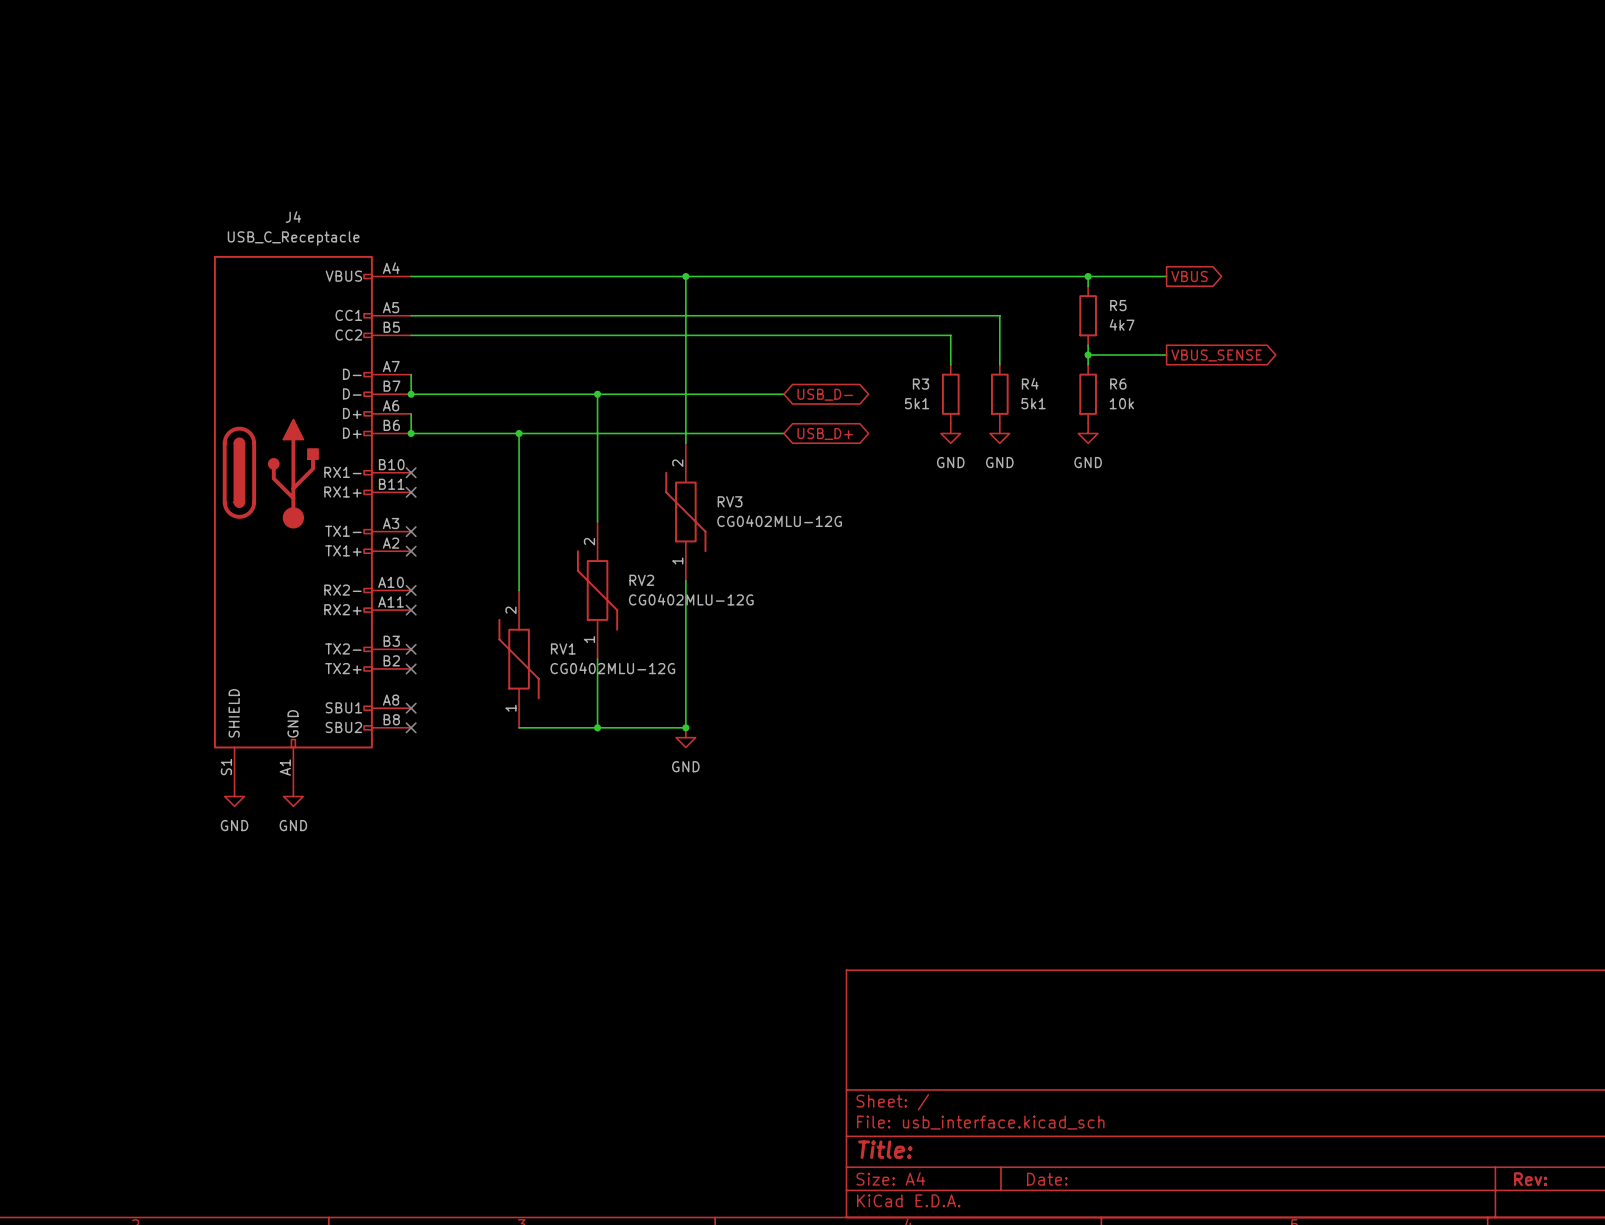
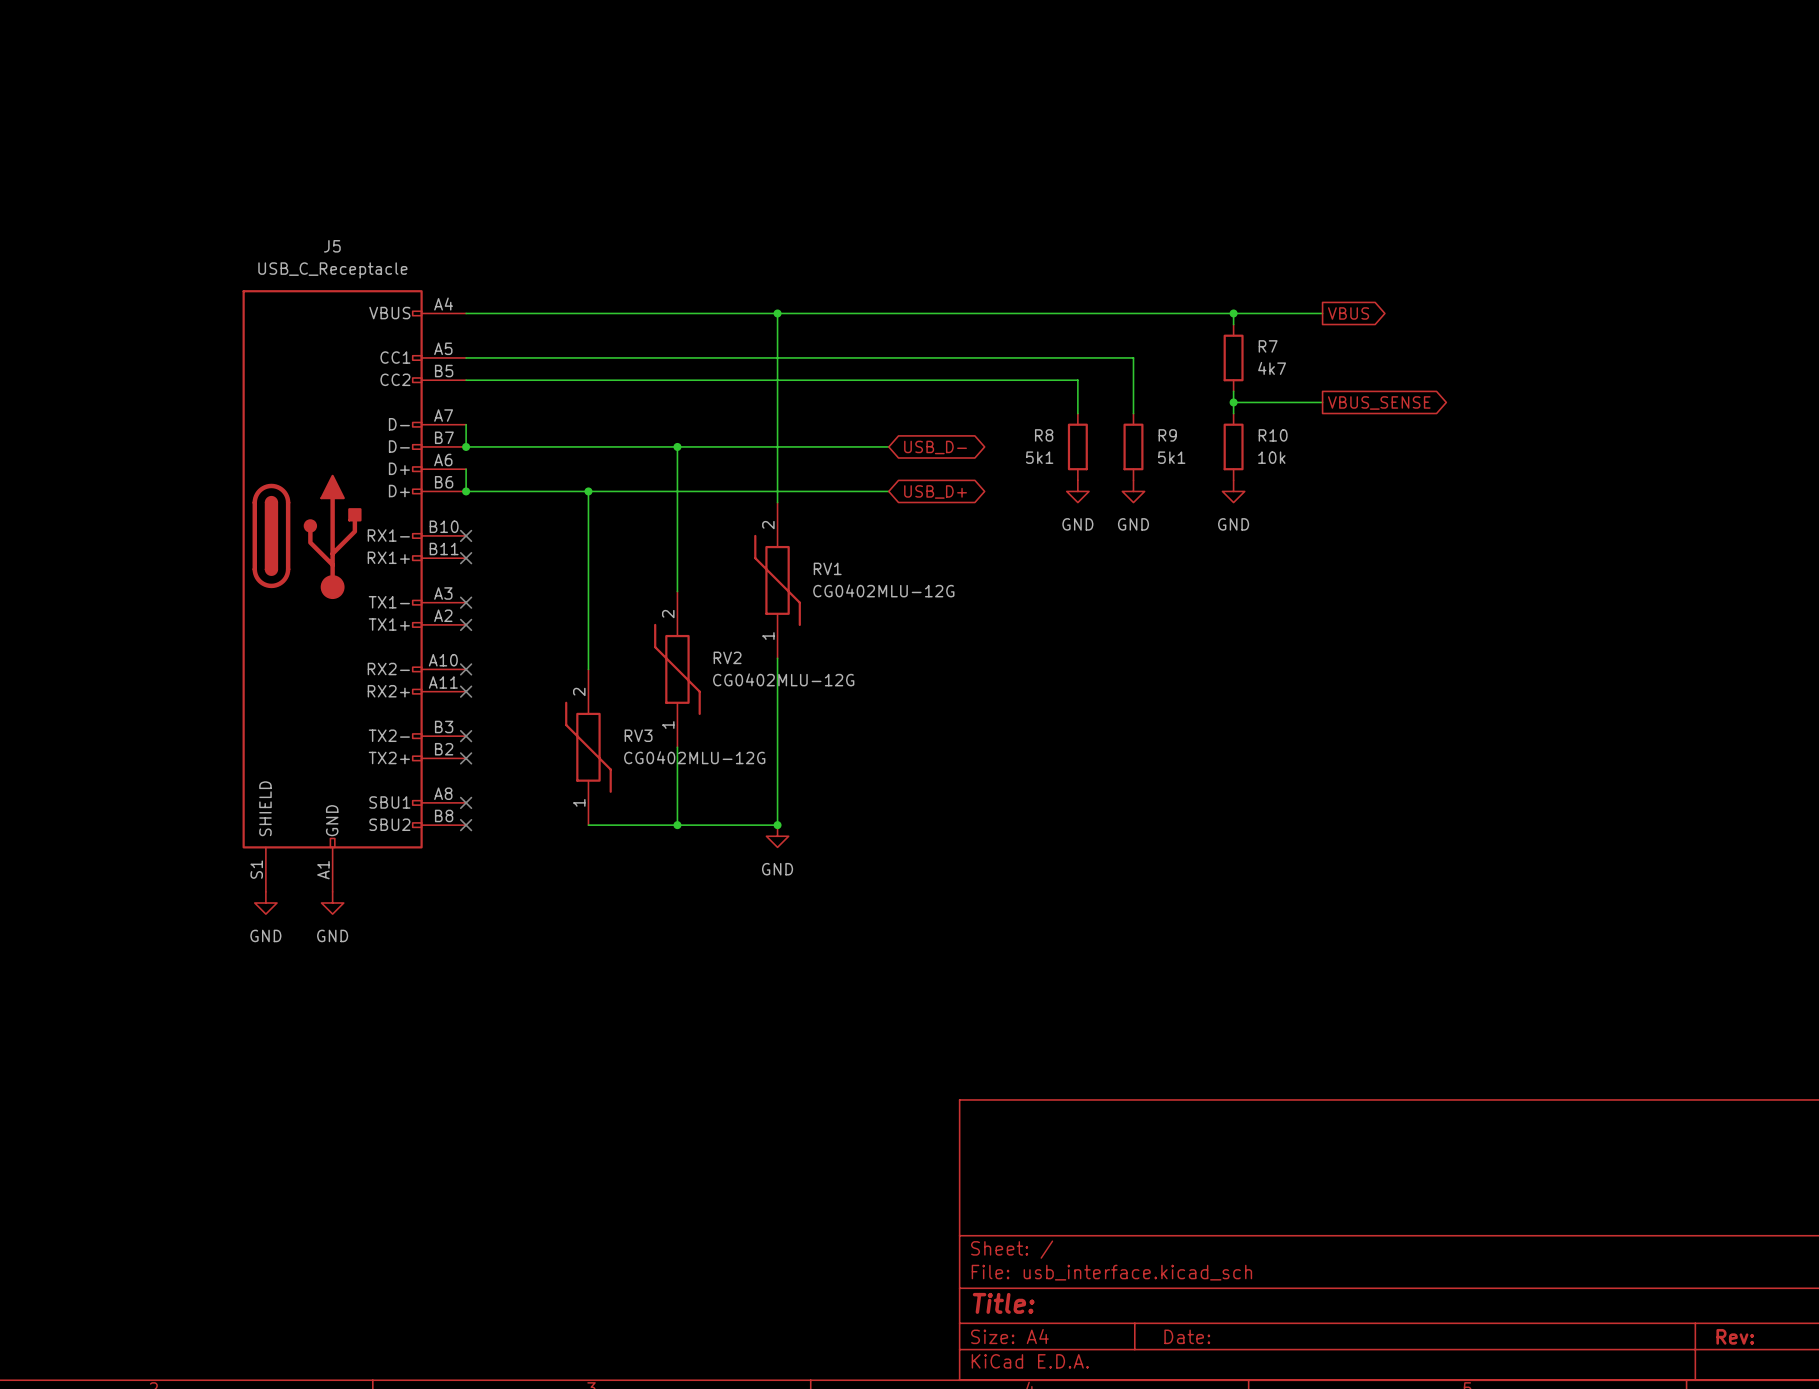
J4 name: J4 (293, 217) -> J5 (332, 246)
R5 name: R5 (1118, 305) -> R7 (1268, 346)
R4 name: R4 (1030, 383) -> R9 (1167, 435)
R3 name: R3 (921, 384) -> R8 (1044, 435)
R6 name: R6 (1118, 384) -> R10 (1273, 435)
RV3 name: RV3 (730, 501) -> RV1 (827, 568)
RV1 name: RV1 (563, 648) -> RV3 (638, 735)

